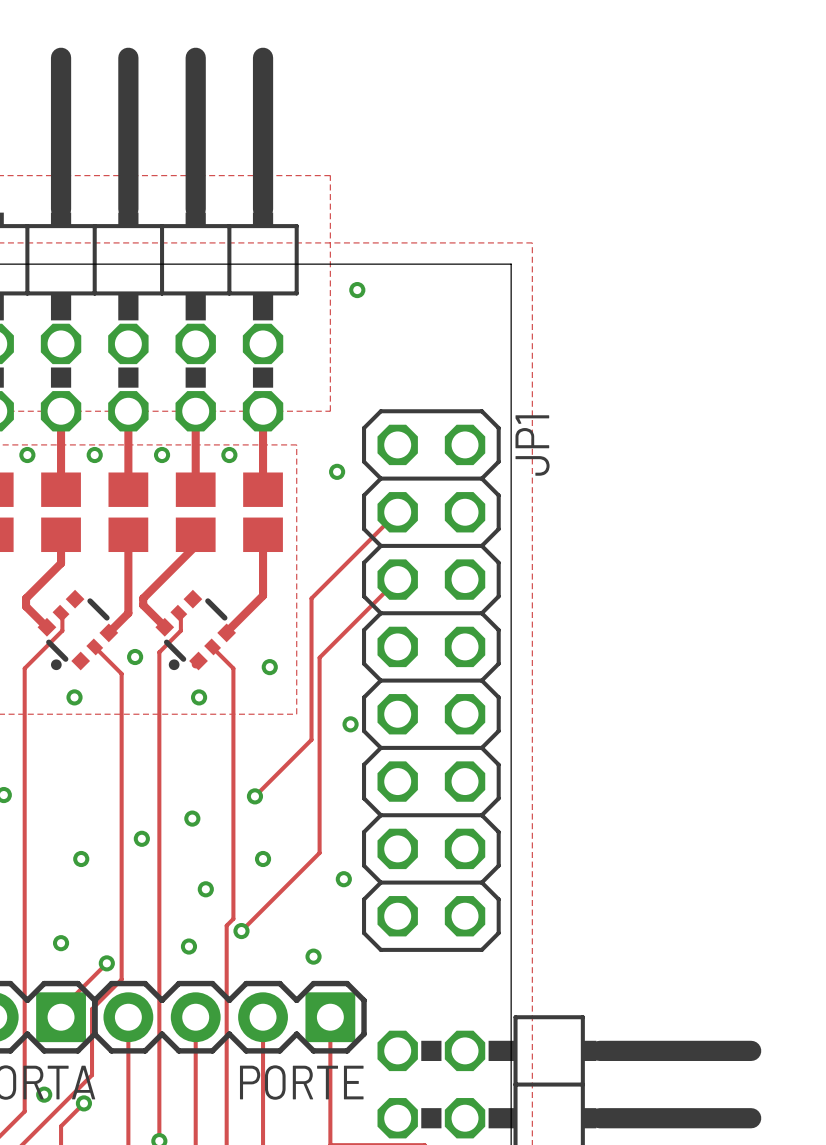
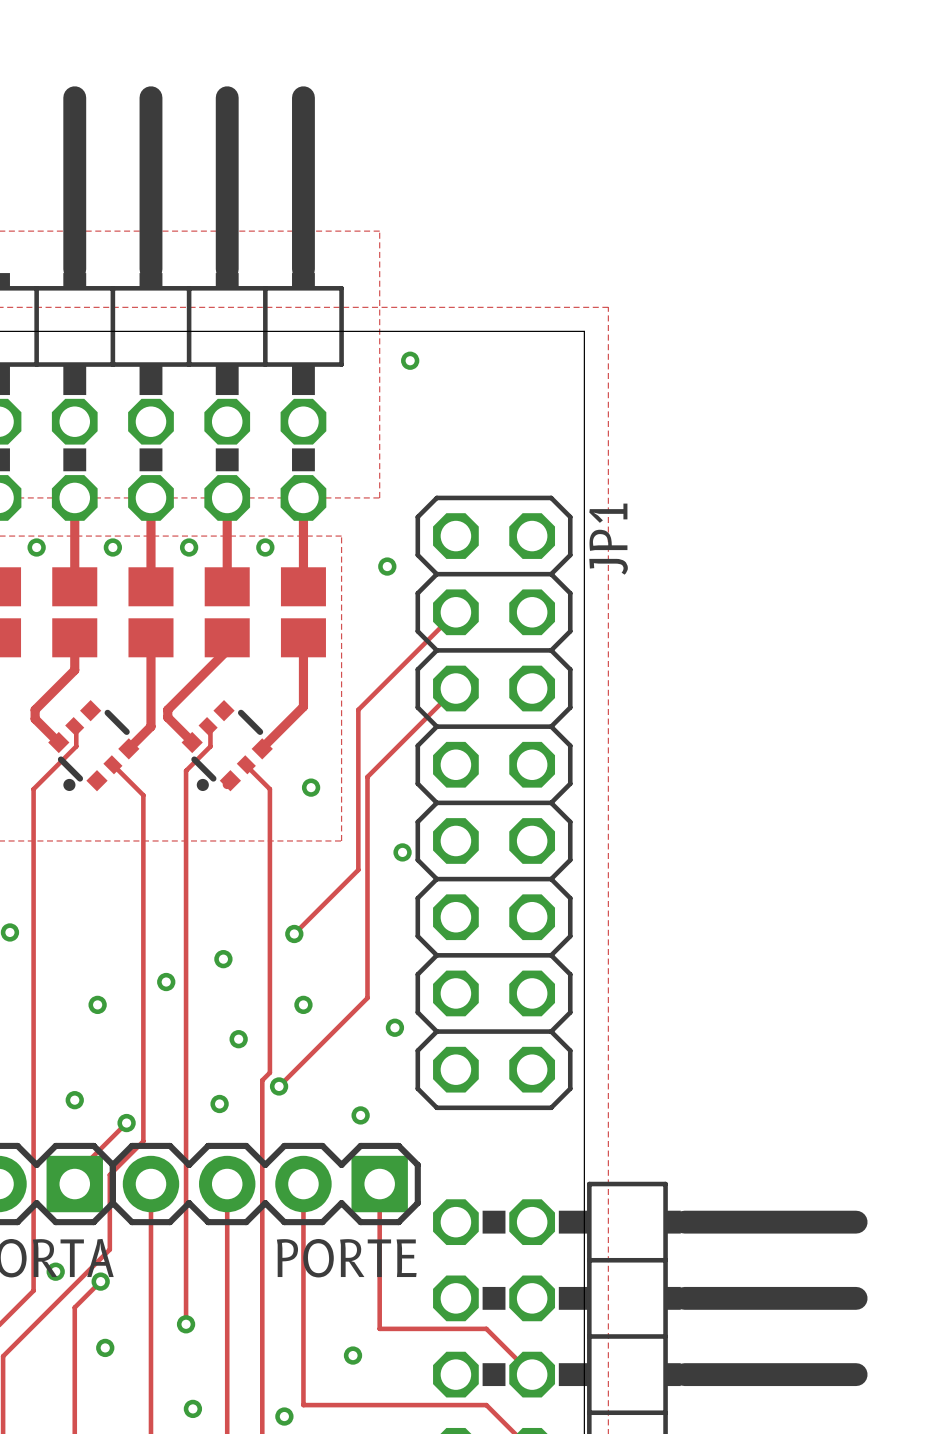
via: (135, 657) -> none
via: (74, 697) -> none
via: (199, 697) -> none

